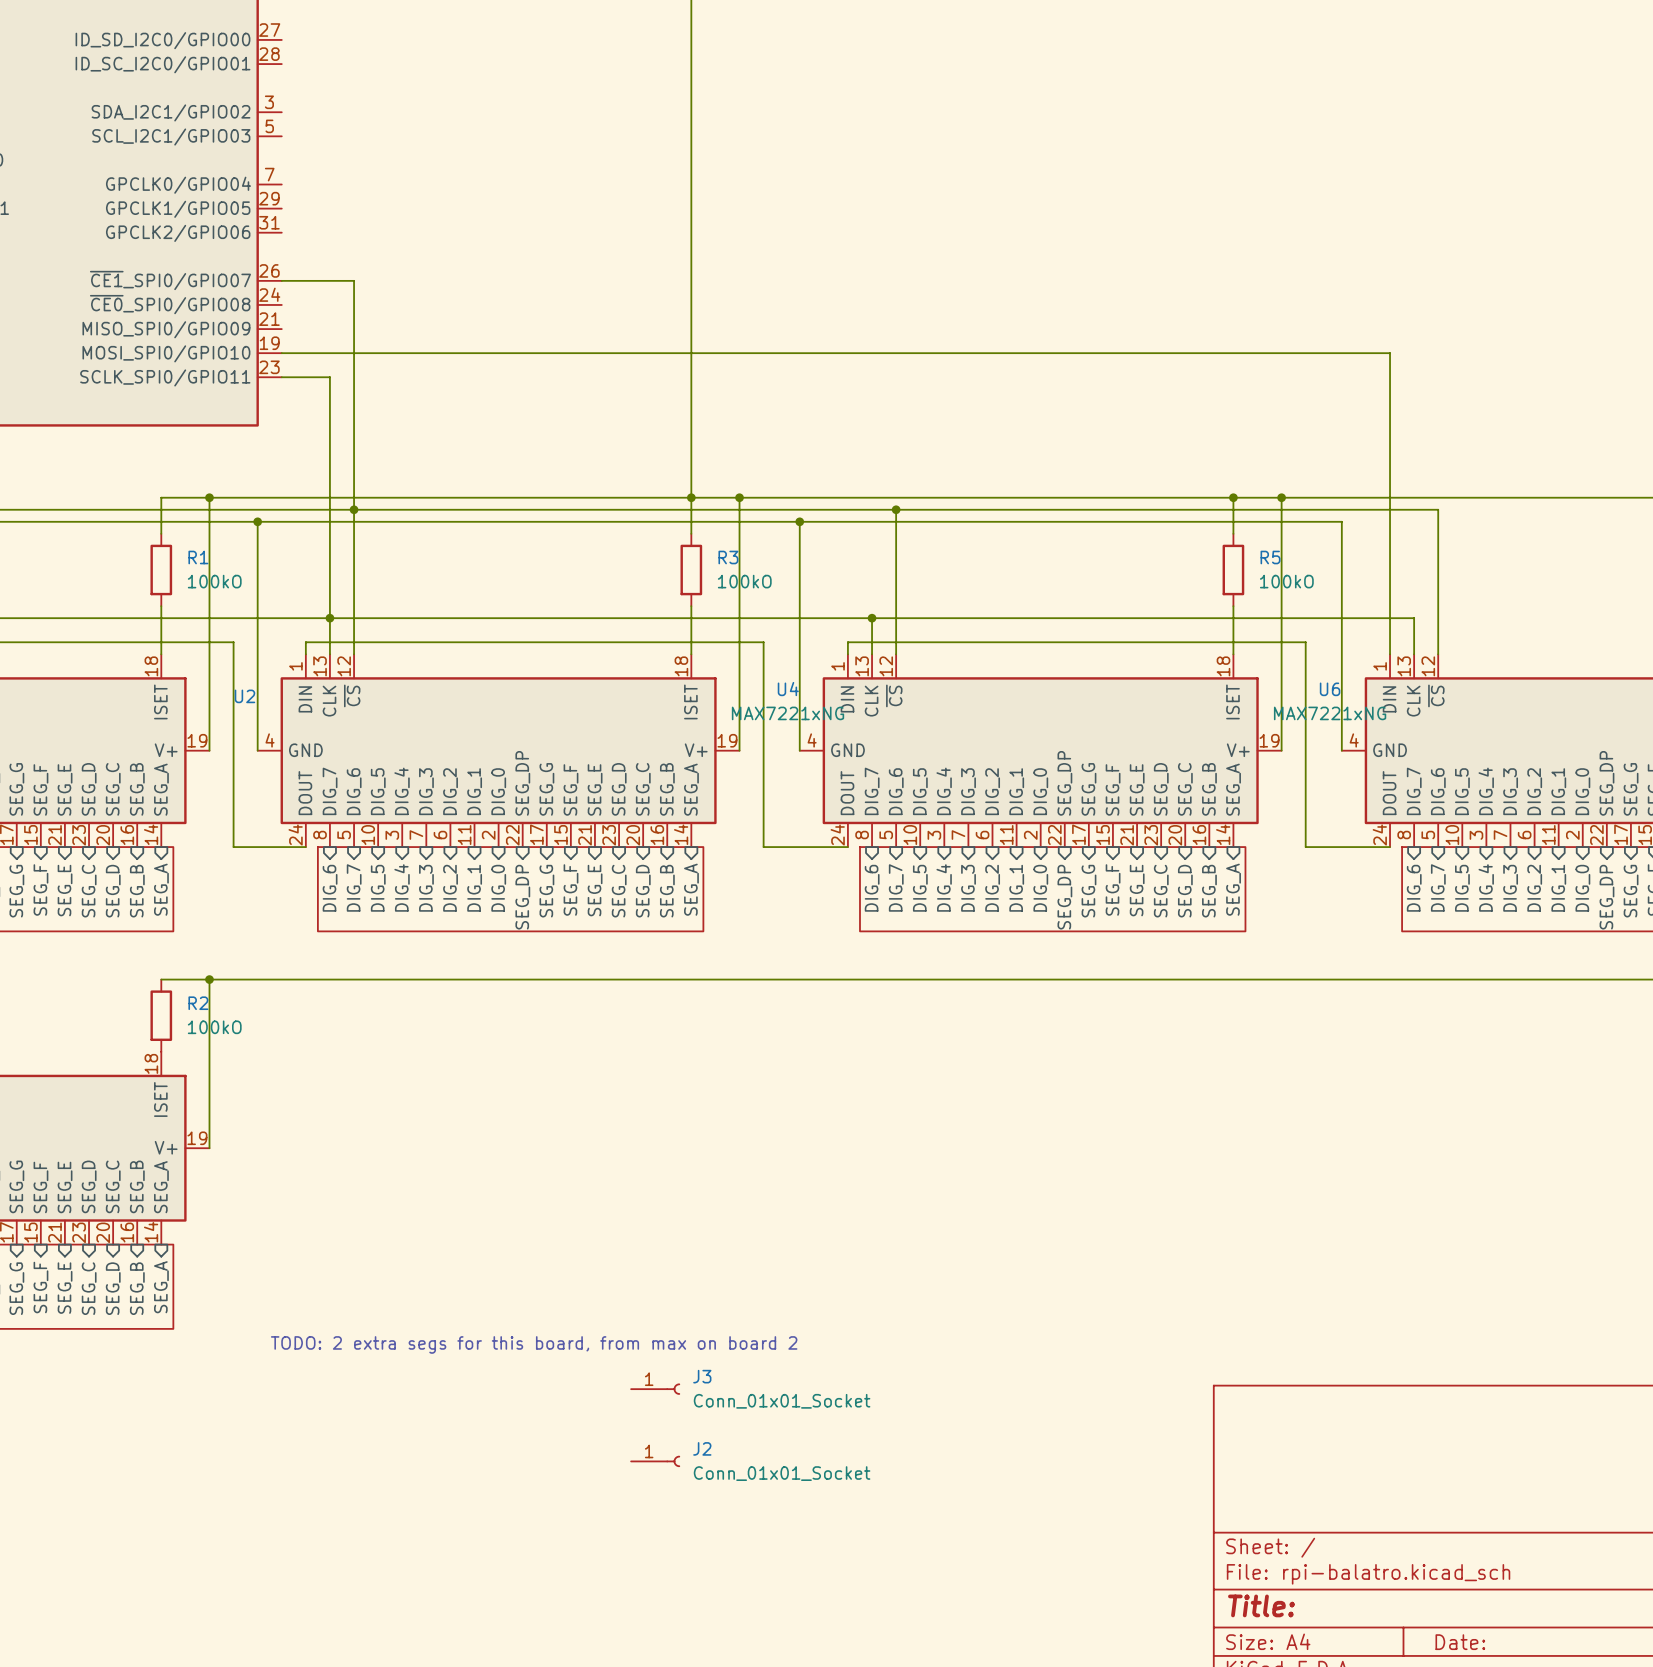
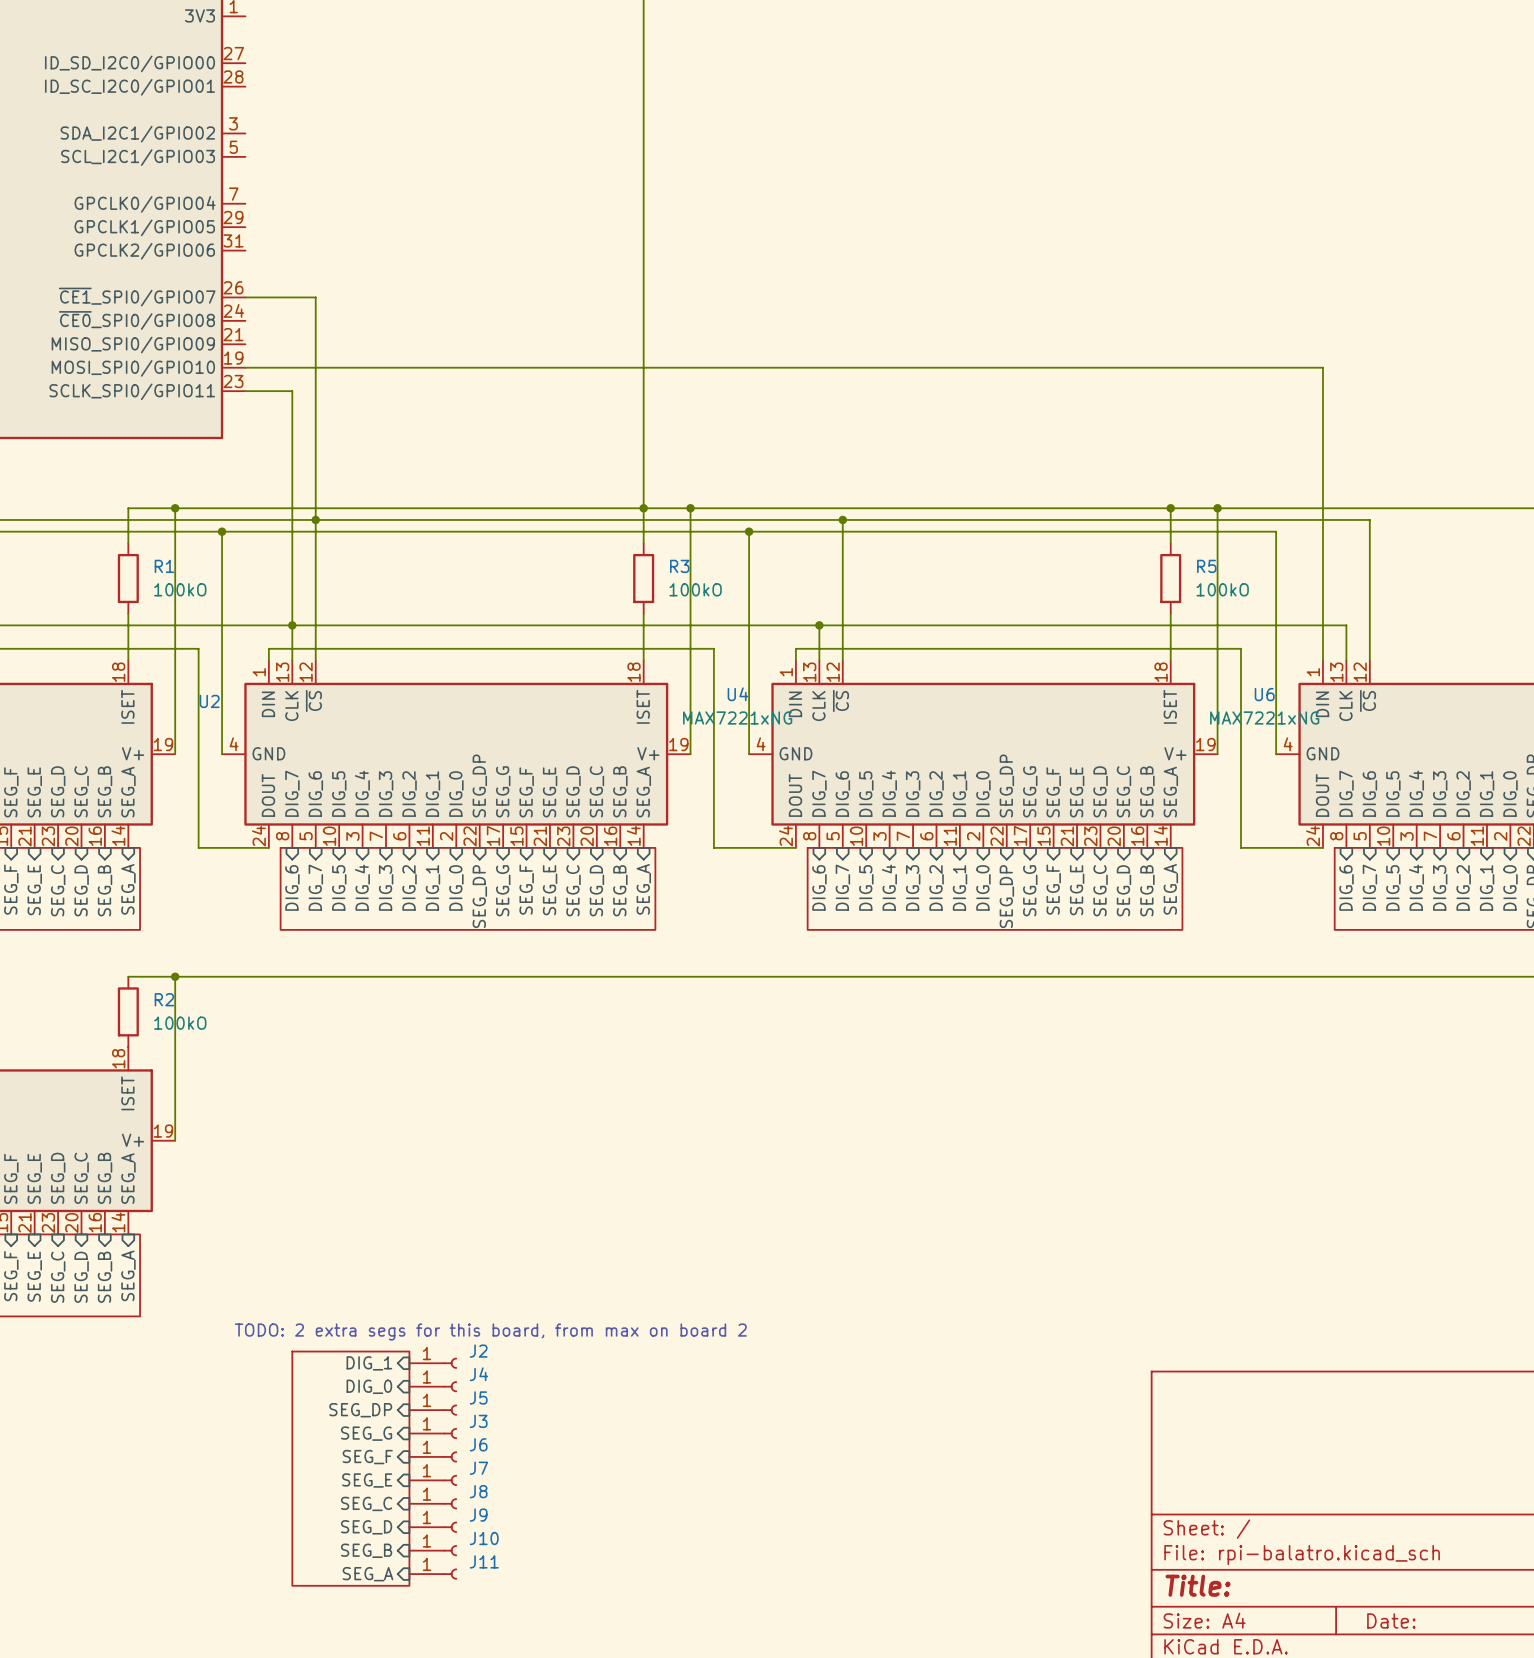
sheet pin: none -> DIG_1 (369, 1363)
J3 position: (655, 1389) -> (433, 1433)
sheet pin: none -> DIG_0 (369, 1386)
J4: none -> (433, 1386)
J3 value: Conn_01x01_Socket (782, 1401) -> none
sheet pin: none -> SEG_DP (360, 1410)
J5: none -> (433, 1410)
sheet pin: none -> SEG_G (366, 1433)
J2 position: (655, 1461) -> (433, 1363)
sheet pin: none -> SEG_F (367, 1457)
J6: none -> (433, 1456)
J2 value: Conn_01x01_Socket (782, 1473) -> none
sheet: none -> (350, 1468)
sheet pin: none -> SEG_E (367, 1480)
J7: none -> (433, 1480)
sheet pin: none -> SEG_C (366, 1503)
J8: none -> (433, 1503)
sheet pin: none -> SEG_D (366, 1527)
J9: none -> (433, 1527)
sheet pin: none -> SEG_B (366, 1550)
J10: none -> (433, 1550)
J11: none -> (433, 1574)
sheet pin: none -> SEG_A (367, 1574)

